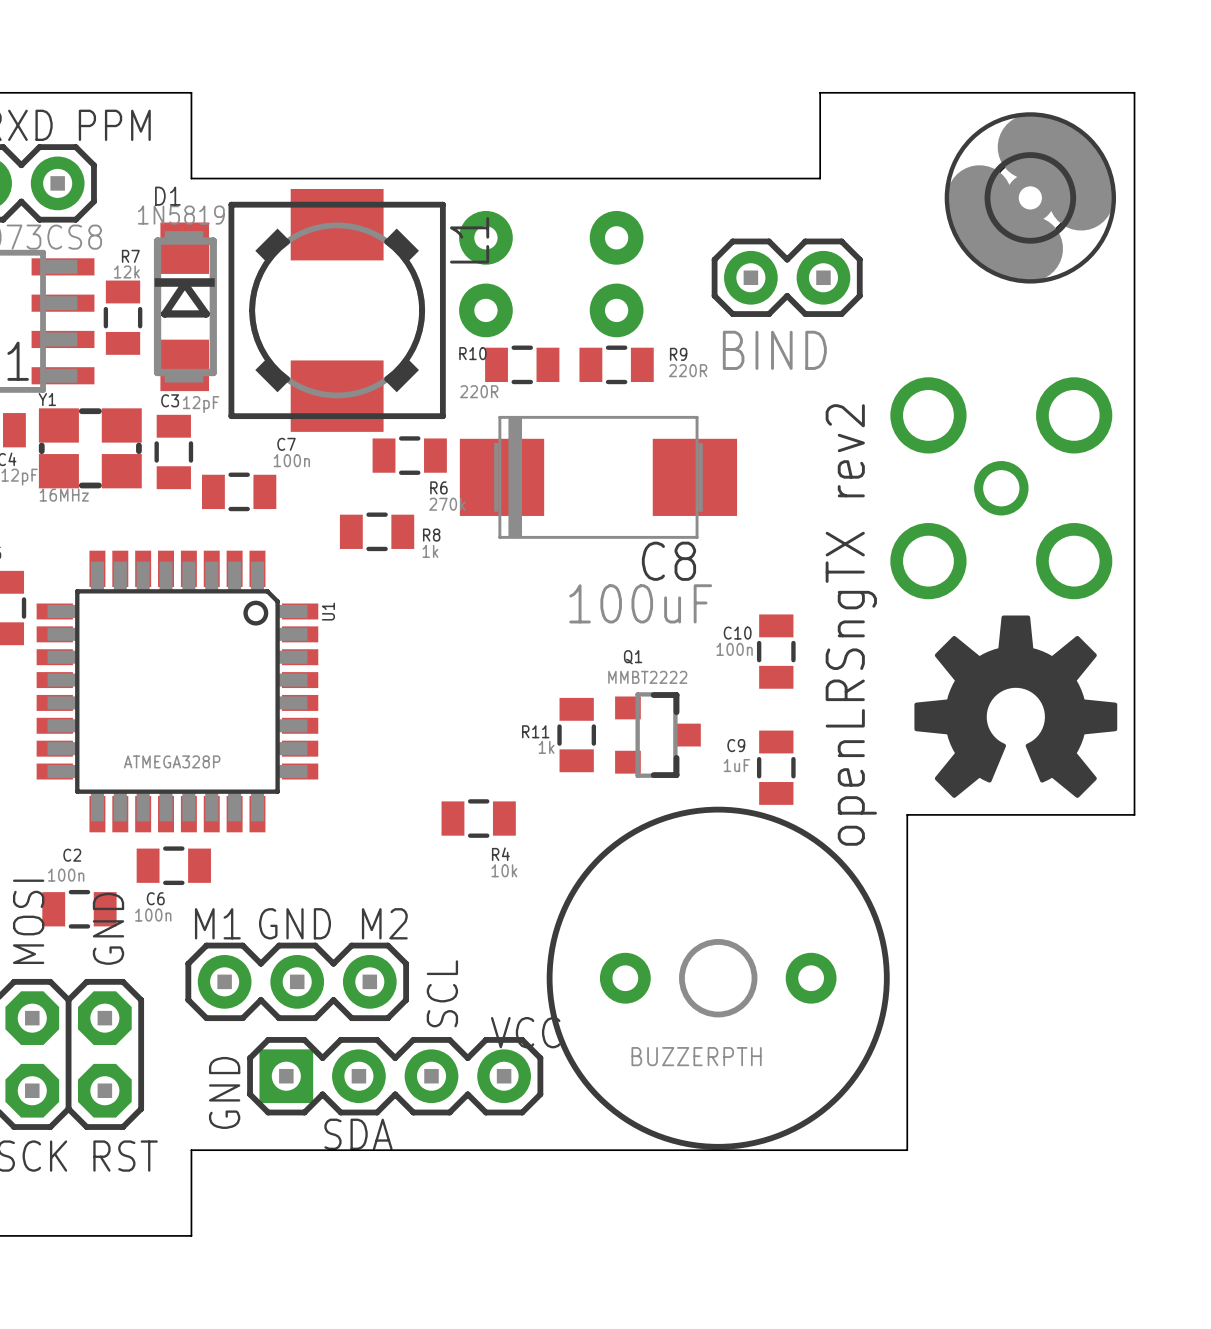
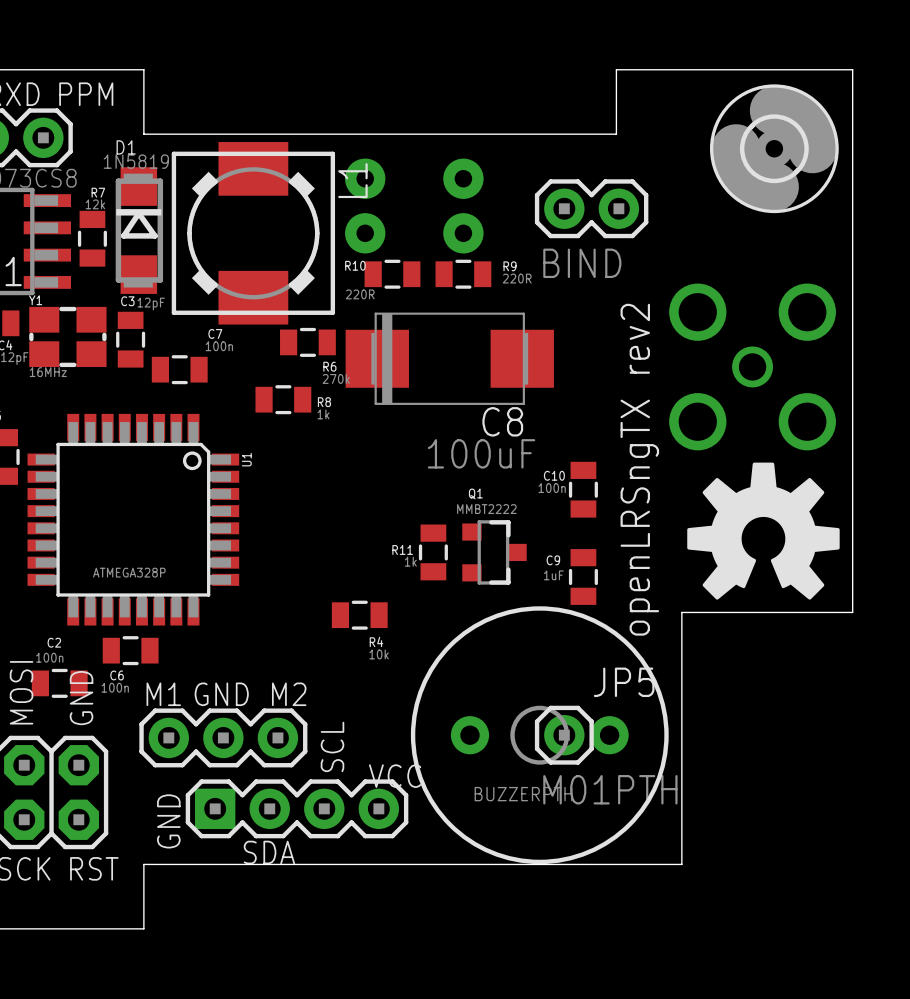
JP5: none -> M01PTH (564, 735)

